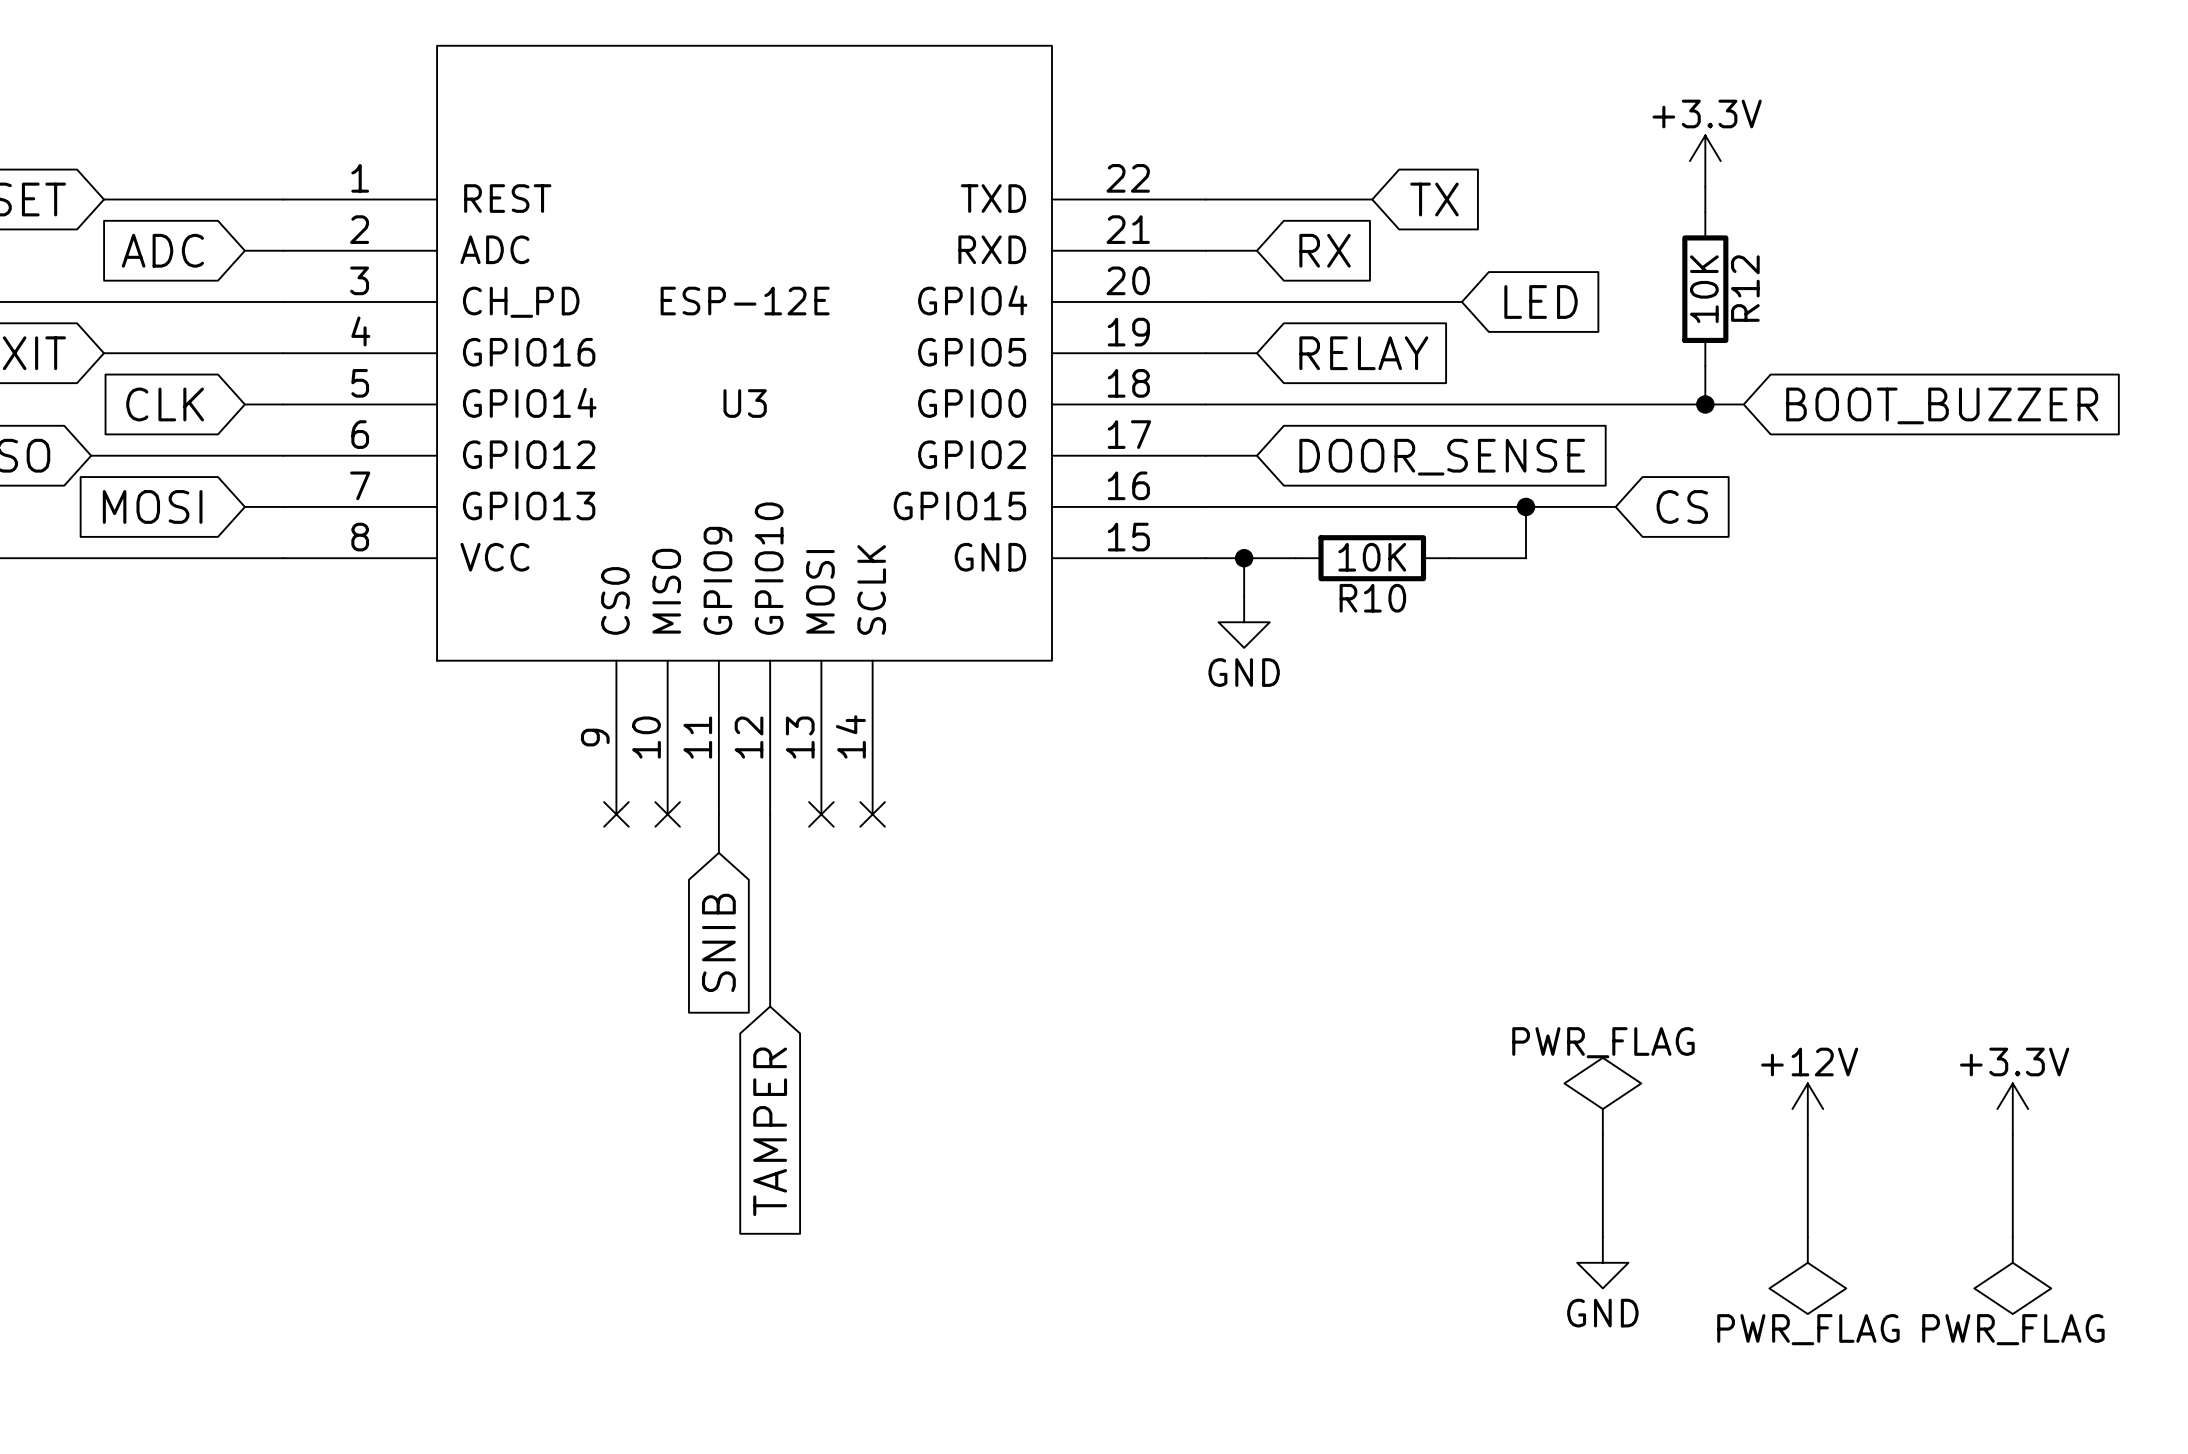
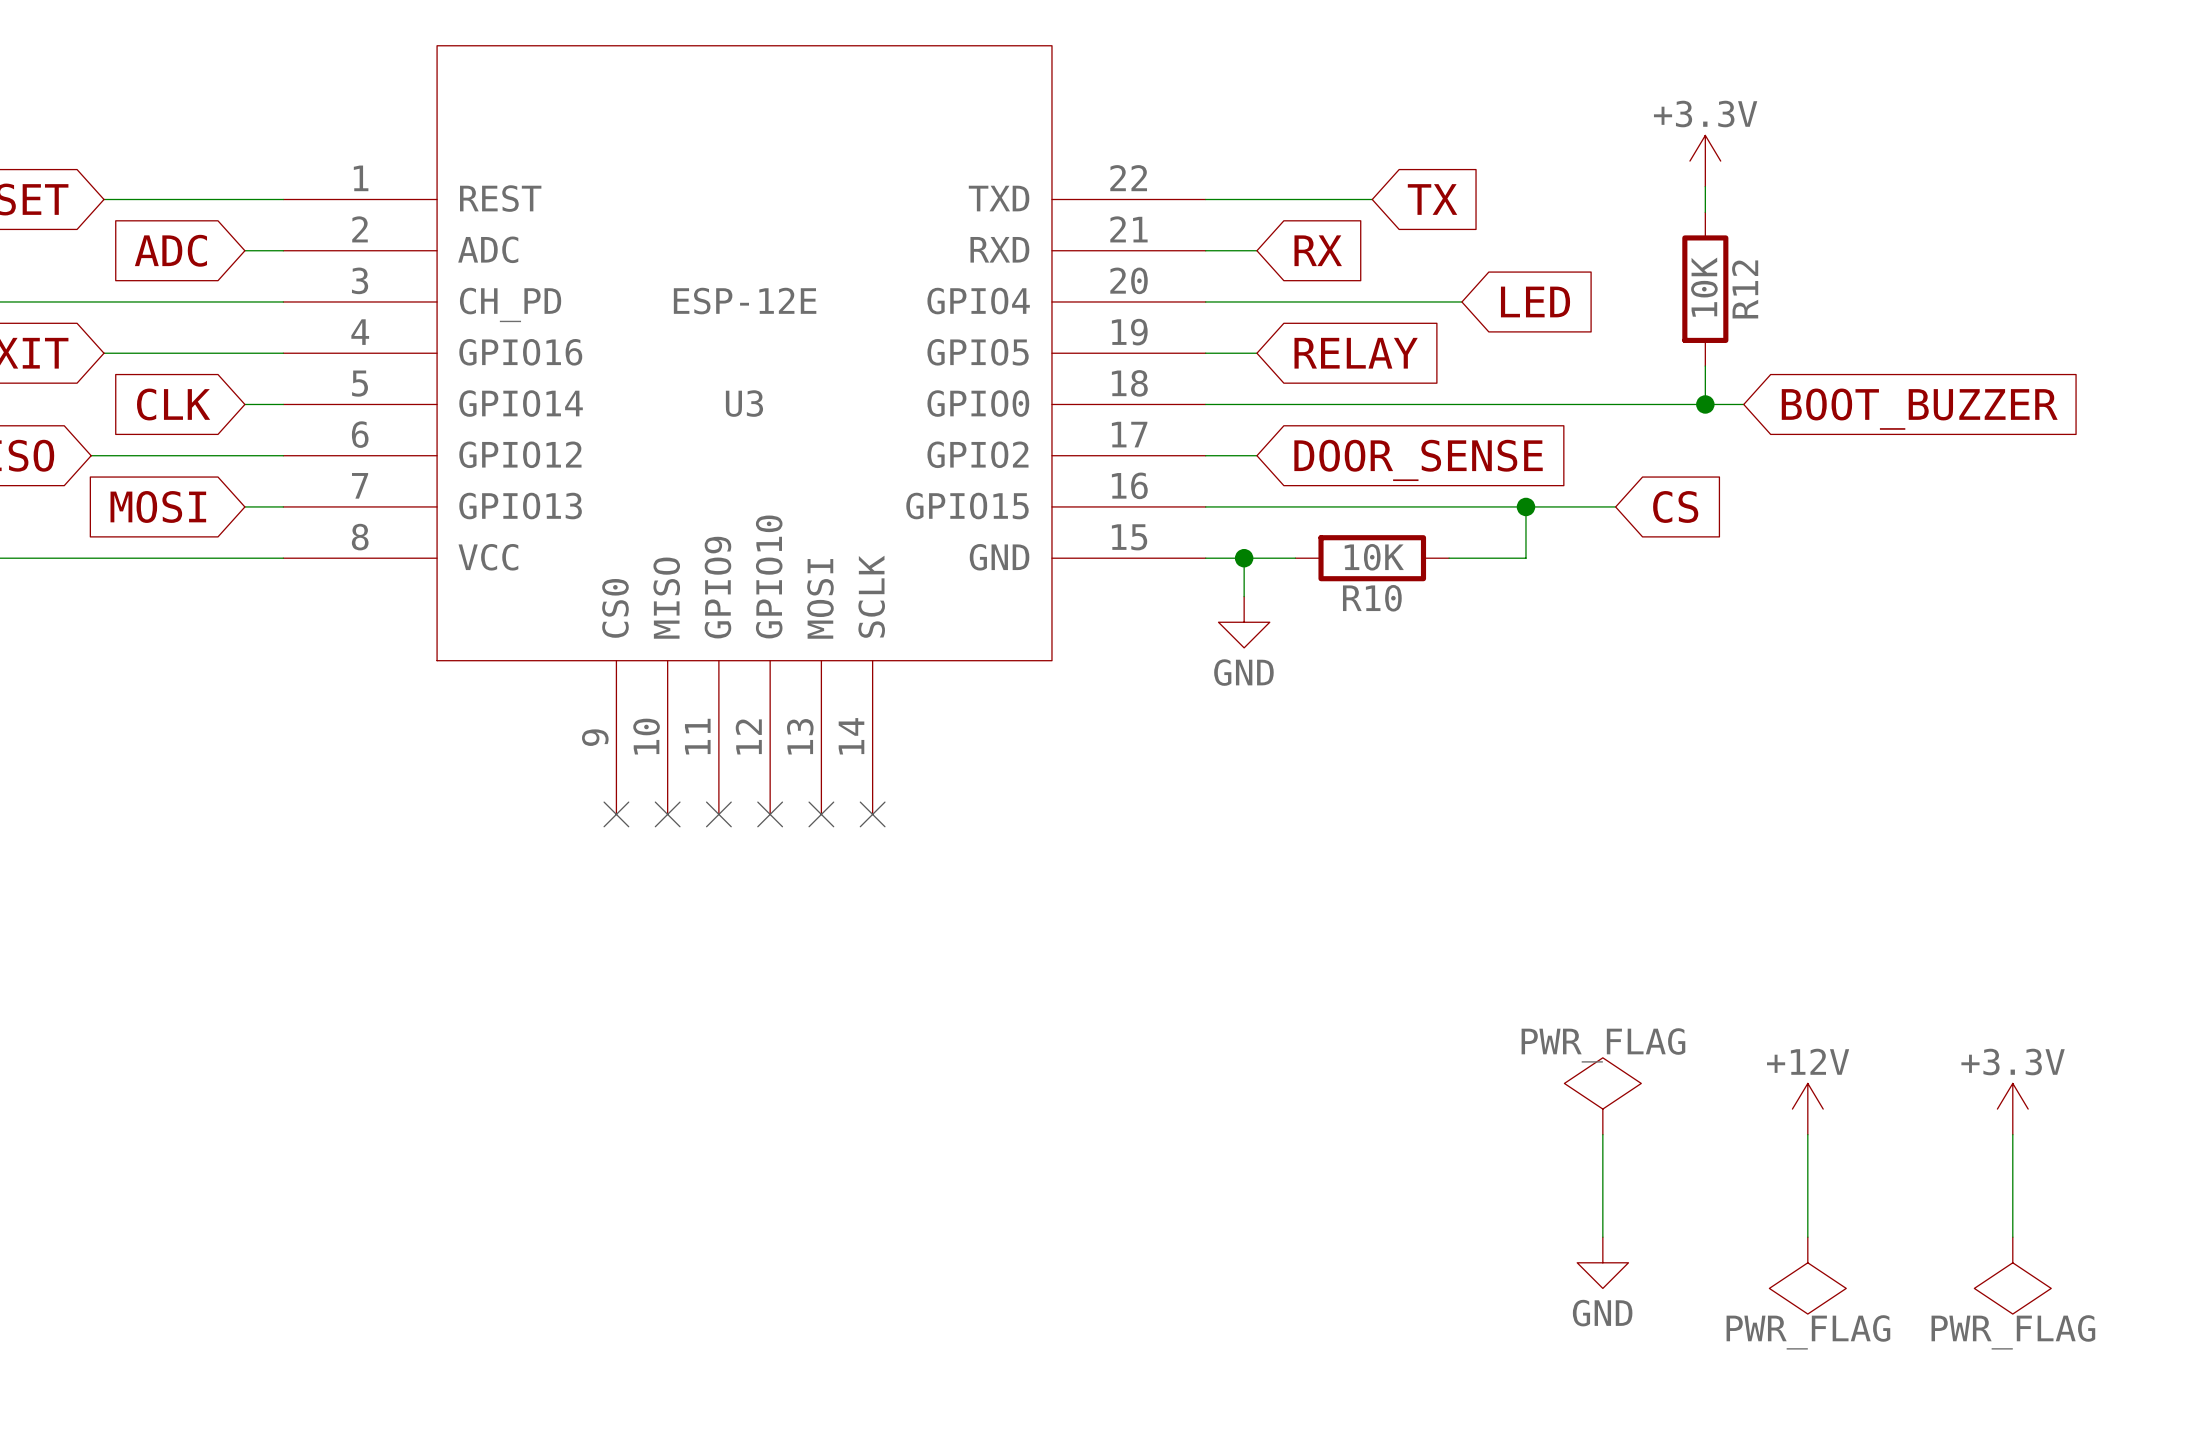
wire: (718, 814) (718, 852) -> none
no-connect mark: none -> (718, 814)
wire: (770, 814) (770, 1006) -> none
no-connect mark: none -> (770, 814)
global label: SNIB (718, 942) -> none
global label: TAMPER (770, 1131) -> none

